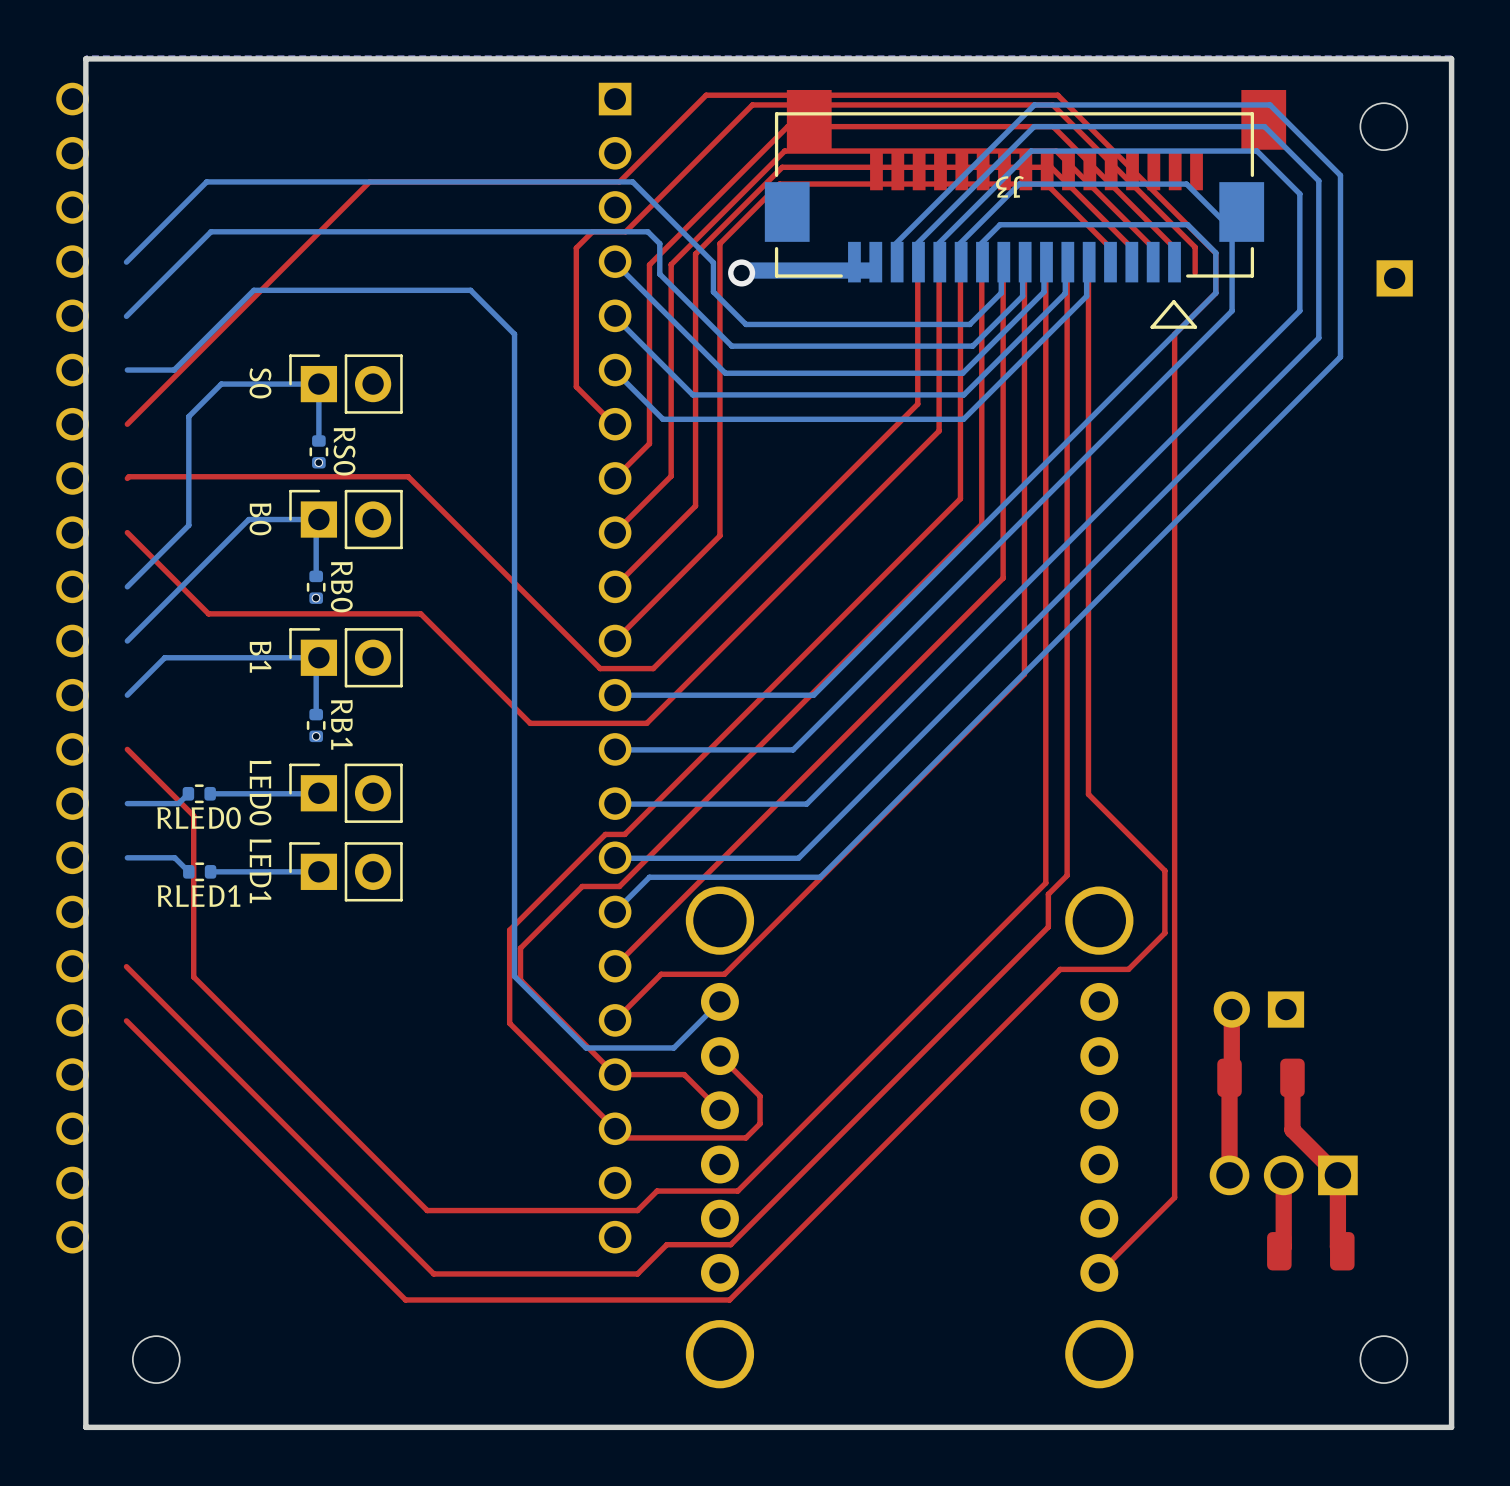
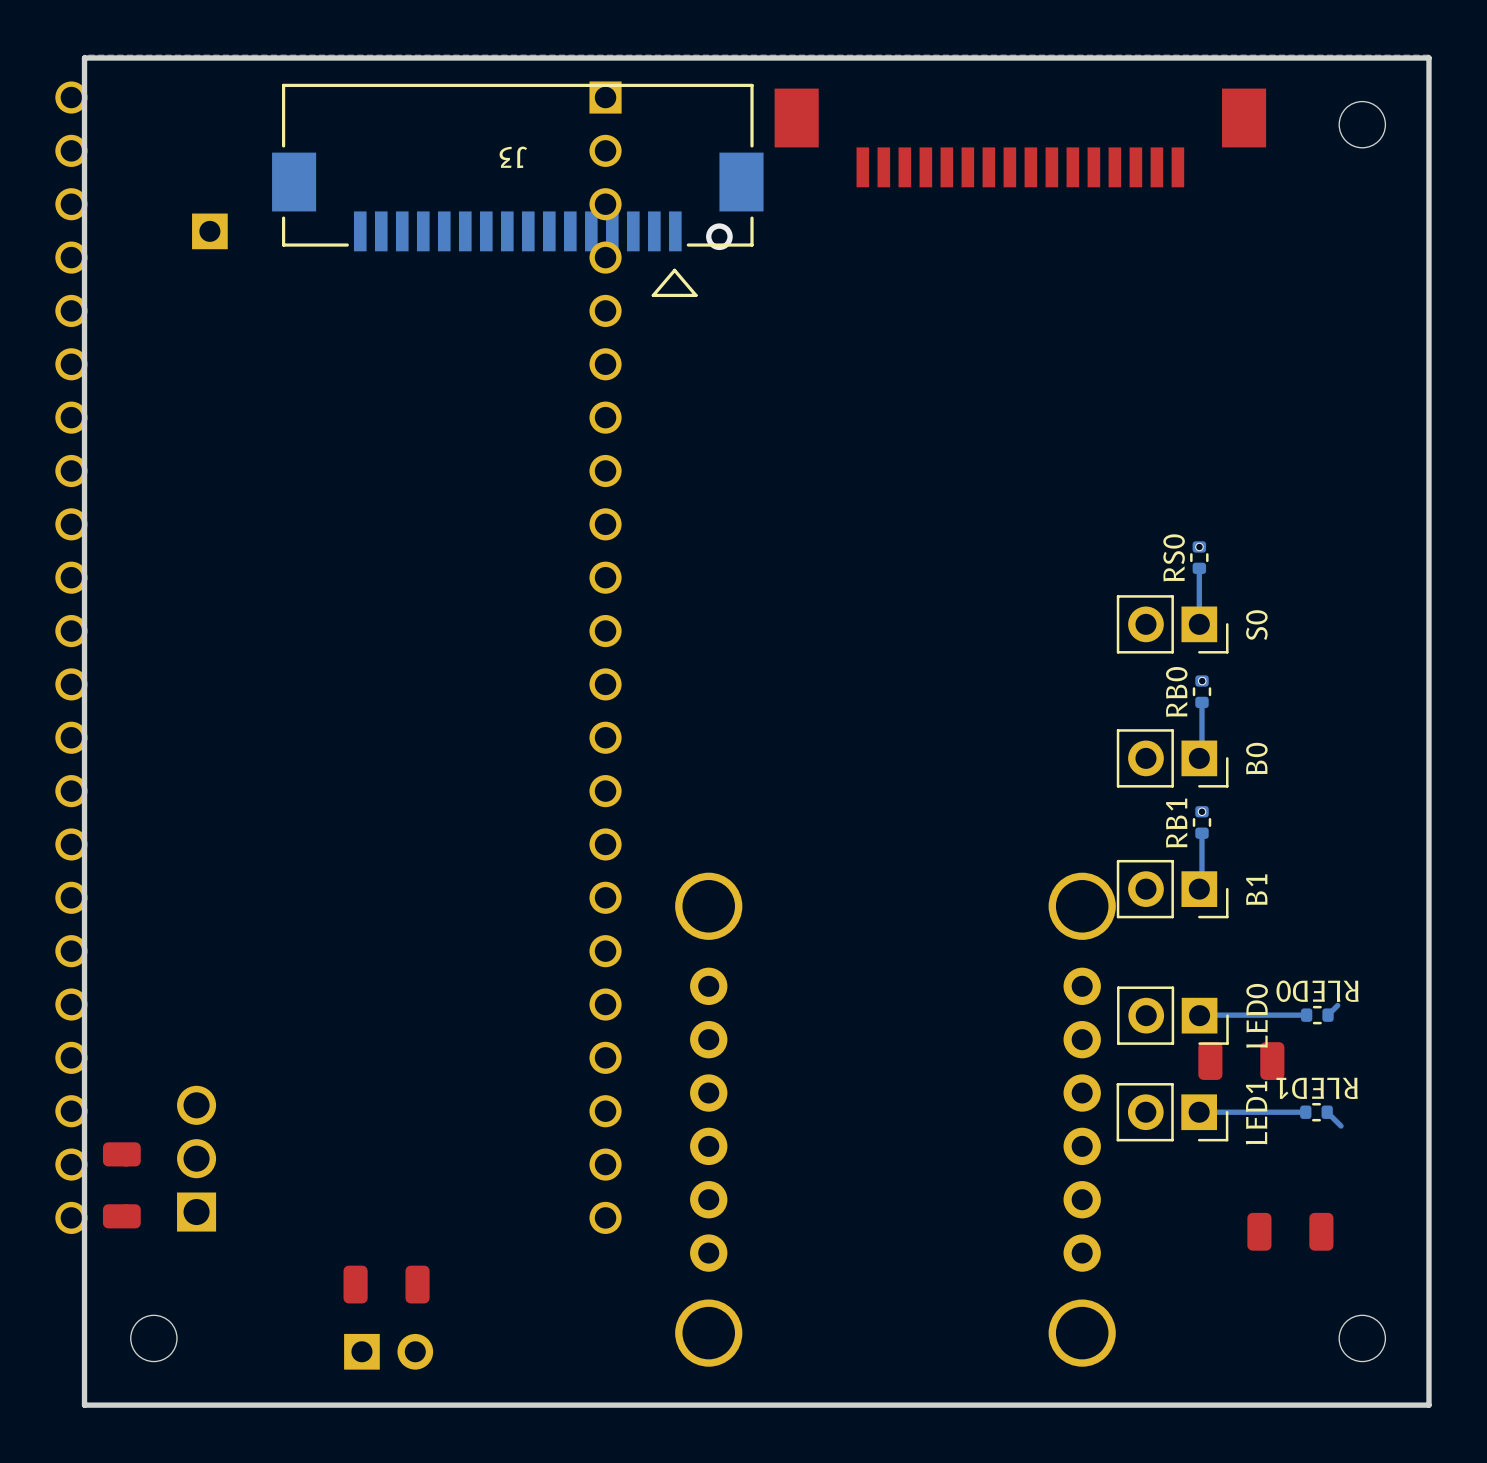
J3 position: (1014, 220) -> (517, 190)
part: none -> (209, 231)
bottom track: (126, 262) (206, 181) (632, 181) (713, 262) (713, 291) (745, 324) (969, 324) (1001, 292) (1001, 270) -> none
bottom track: (614, 262) (725, 373) (962, 373) (1043, 292) (1043, 270) -> none
bottom track: (873, 270) (744, 270) (741, 272) -> none
bottom track: (894, 270) (894, 244) (1034, 104) (1270, 104) (1340, 175) (1340, 356) (820, 877) (649, 877) (614, 912) -> none
bottom track: (915, 270) (915, 244) (1034, 126) (1264, 126) (1318, 180) (1318, 338) (798, 858) (614, 858) -> none
bottom track: (937, 270) (937, 244) (1031, 151) (1256, 151) (1299, 193) (1299, 310) (806, 804) (614, 804) -> none
bottom track: (958, 270) (958, 244) (1019, 184) (1186, 184) (1232, 229) (1232, 310) (793, 749) (614, 749) -> none
bottom track: (979, 270) (979, 244) (1000, 224) (1187, 224) (1215, 252) (1215, 293) (813, 695) (615, 695) -> none
bottom track: (1022, 270) (1022, 296) (972, 346) (731, 346) (659, 274) (659, 243) (647, 231) (211, 231) (126, 316) -> none
bottom track: (1065, 270) (1065, 293) (963, 394) (692, 394) (614, 316) -> none
bottom track: (1086, 270) (1086, 296) (963, 419) (663, 419) (614, 370) -> none
via position: (741, 272) -> (719, 236)
top track: (917, 272) (917, 404) (653, 668) (600, 668) (408, 476) (129, 476) (127, 478) -> none
top track: (939, 272) (939, 431) (646, 723) (530, 723) (420, 613) (208, 613) (127, 532) -> none
top track: (960, 272) (960, 498) (624, 834) (605, 834) (509, 930) (509, 1023) (624, 1137) (745, 1137) (760, 1123) (760, 1096) (719, 1056) -> none
top track: (981, 272) (981, 524) (619, 886) (582, 886) (520, 948) (520, 979) (615, 1074) (684, 1074) (719, 1110) -> none
top track: (1003, 272) (1003, 578) (615, 966) -> none
top track: (1024, 272) (1024, 674) (724, 974) (661, 974) (615, 1020) -> none
top track: (1045, 272) (1045, 883) (737, 1191) (657, 1191) (637, 1210) (427, 1210) (193, 976) (193, 815) (127, 749) -> none
top track: (1067, 272) (1067, 875) (1048, 894) (1048, 927) (730, 1244) (666, 1244) (637, 1273) (433, 1273) (126, 966) -> none
top track: (1088, 272) (1088, 794) (1164, 870) (1164, 933) (1128, 969) (1060, 969) (729, 1299) (405, 1299) (126, 1020) -> none
top track: (1109, 272) (1109, 247) (1046, 184) (779, 184) (719, 243) (719, 535) (614, 641) -> none
top track: (1131, 272) (1131, 247) (1051, 167) (782, 167) (695, 254) (695, 506) (614, 587) -> none
top track: (1152, 272) (1152, 247) (1056, 151) (784, 151) (671, 264) (671, 476) (614, 533) -> none
top track: (1173, 272) (1173, 247) (1053, 126) (787, 126) (649, 264) (649, 443) (614, 478) -> none
top track: (1195, 272) (1195, 247) (1052, 104) (752, 104) (625, 231) (592, 231) (576, 248) (576, 386) (614, 424) -> none
part: (1394, 278) -> none
bottom track: (127, 370) (174, 370) (253, 290) (470, 290) (514, 334) (514, 976) (586, 1047) (673, 1047) (719, 1001) -> none
S0 rotation: 0° (345, 384) -> 180° (1172, 624)
S0 position: (345, 384) -> (1172, 624)
top track: (127, 424) (369, 181) (619, 181) (706, 95) (1057, 95) (1215, 253) (1215, 293) (1174, 334) (1174, 1197) (1099, 1272) -> none
bottom track: (318, 440) (318, 384) (221, 384) (188, 416) (188, 525) (127, 586) -> none
RS0 position: (318, 451) -> (1199, 557)
RS0 name rotation: 0° (344, 451) -> 180° (1174, 557)
via: (318, 462) -> none
B0 rotation: 0° (345, 519) -> 180° (1172, 758)
B0 position: (345, 519) -> (1172, 758)
via: none -> (1199, 546)
bottom track: (316, 576) (316, 522) (318, 519) (248, 519) (127, 641) -> none
bottom track: none -> (1199, 568) (1199, 624)
RB0 position: (316, 587) -> (1202, 691)
RB0 name rotation: 0° (341, 587) -> 180° (1176, 691)
via: (315, 598) -> none
B1 rotation: 0° (345, 657) -> 180° (1172, 889)
B1 position: (345, 657) -> (1172, 889)
via: none -> (1202, 681)
bottom track: (127, 695) (164, 657) (318, 657) (316, 660) (316, 714) -> none
bottom track: none -> (1202, 702) (1202, 755) (1199, 758)
RB1 name rotation: 0° (341, 724) -> 180° (1176, 823)
RB1 position: (316, 725) -> (1202, 822)
via: (316, 736) -> none
bottom track: (188, 793) (178, 803) (127, 803) -> none
RLED0 position: (199, 793) -> (1317, 1015)
bottom track: (318, 793) (210, 793) -> none
LED0 rotation: 0° (345, 793) -> 180° (1172, 1015)
LED0 position: (345, 793) -> (1172, 1015)
RLED0 name rotation: 0° (199, 818) -> 180° (1317, 991)
via: none -> (1202, 811)
bottom track: none -> (1202, 833) (1202, 886) (1199, 889)
bottom track: (127, 857) (174, 857) (188, 871) -> none
RLED1 position: (199, 871) -> (1316, 1112)
bottom track: (318, 871) (210, 871) -> none
LED1 rotation: 0° (345, 871) -> 180° (1172, 1112)
LED1 position: (345, 871) -> (1172, 1112)
RLED1 name rotation: 0° (199, 895) -> 180° (1317, 1088)
top track: (1231, 1009) (1229, 1175) -> none
part: (1258, 1009) -> none
bottom track: none -> (1337, 1005) (1328, 1015)
bottom track: none -> (1306, 1015) (1199, 1015)
top track: (1292, 1077) (1292, 1129) (1337, 1175) (1337, 1246) (1342, 1251) -> none
bottom track: none -> (1305, 1112) (1199, 1112)
bottom track: none -> (1327, 1112) (1341, 1126)
top track: (1283, 1175) (1283, 1246) (1279, 1251) -> none
part: (1283, 1175) -> none
part: none -> (196, 1158)
part: none -> (121, 1185)
part: none -> (386, 1284)
part: none -> (388, 1351)

